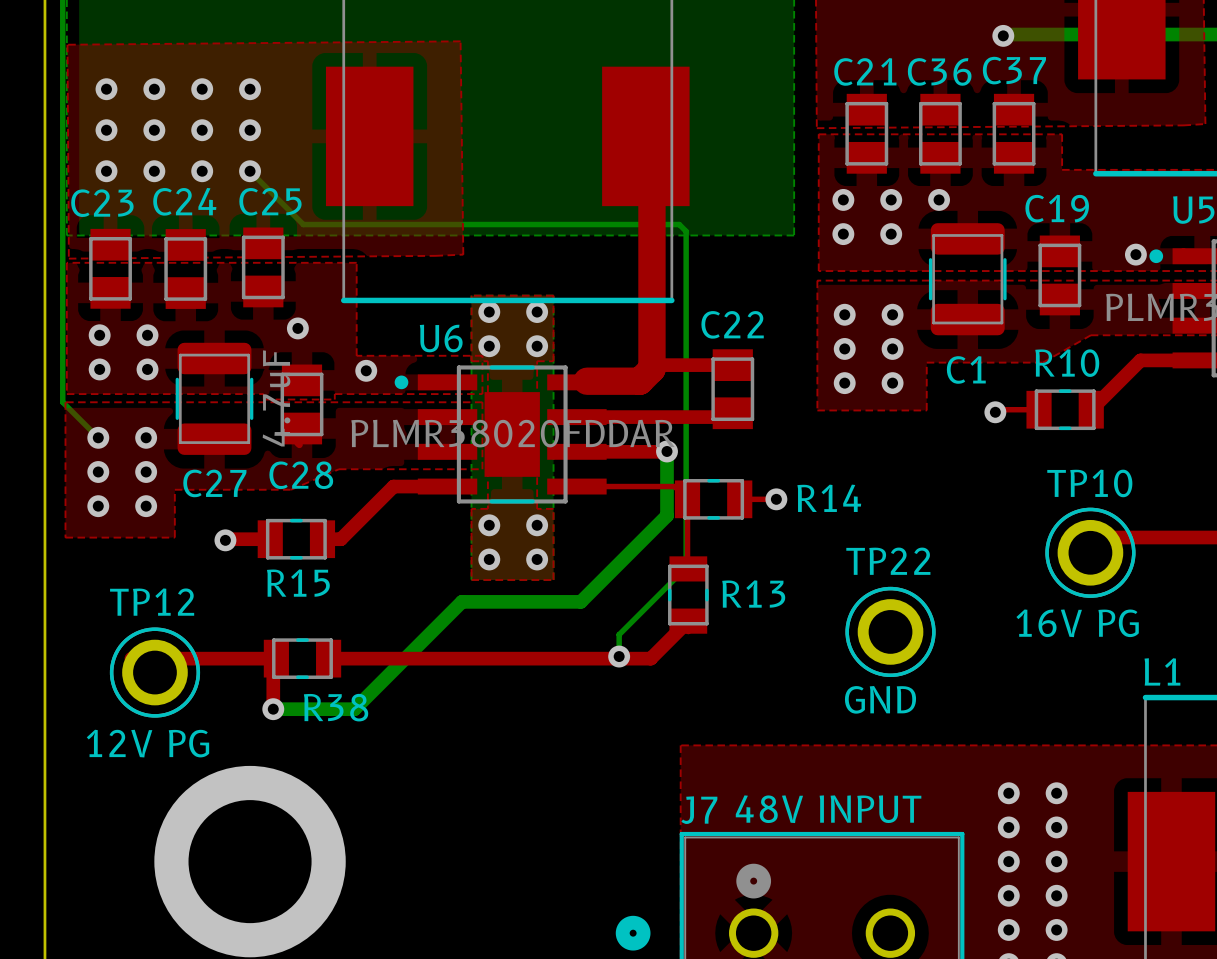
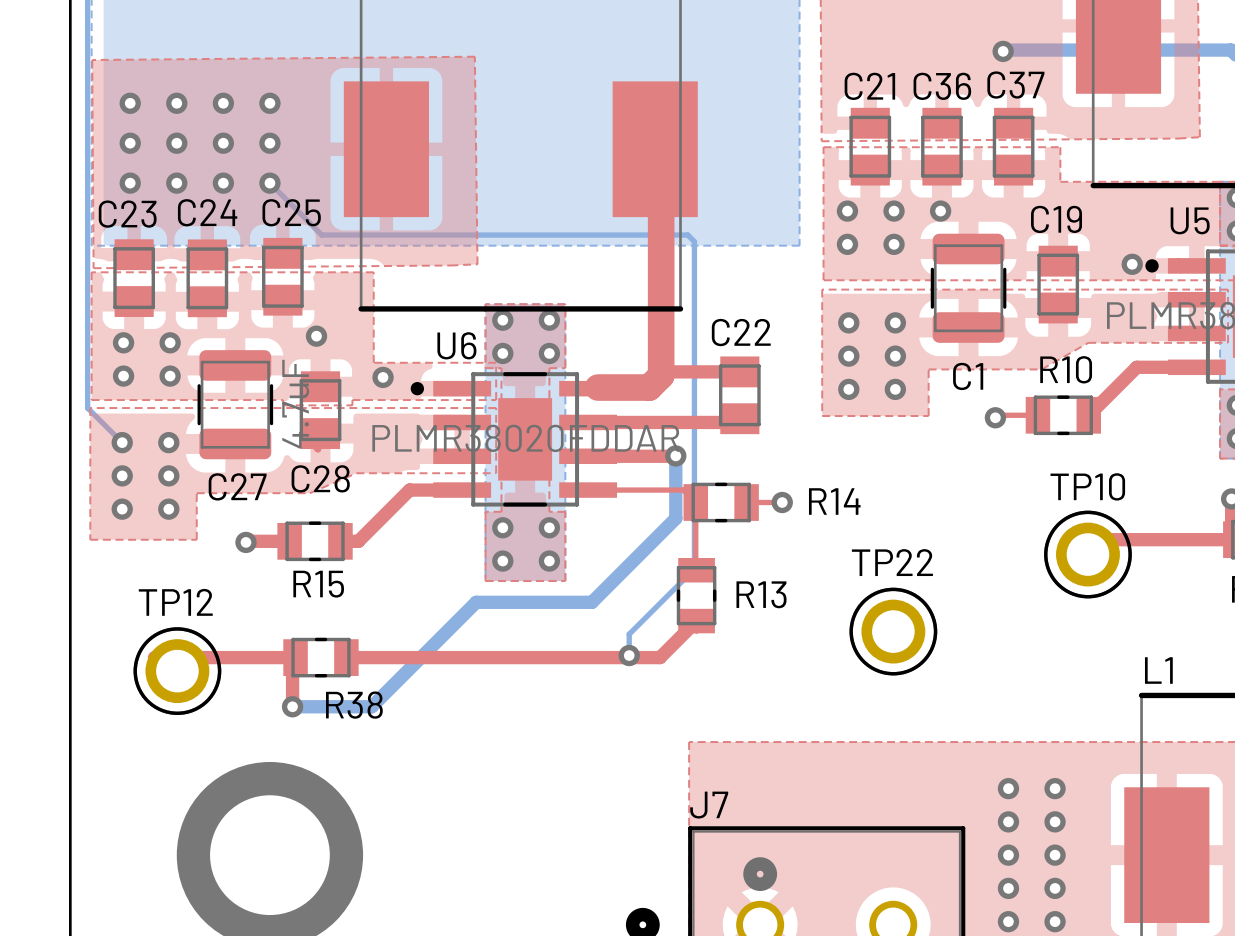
text: 16V PG (1077, 623) -> none
text: GND (880, 699) -> none
text: 12V PG (147, 743) -> none
text: 48V INPUT (828, 809) -> none

